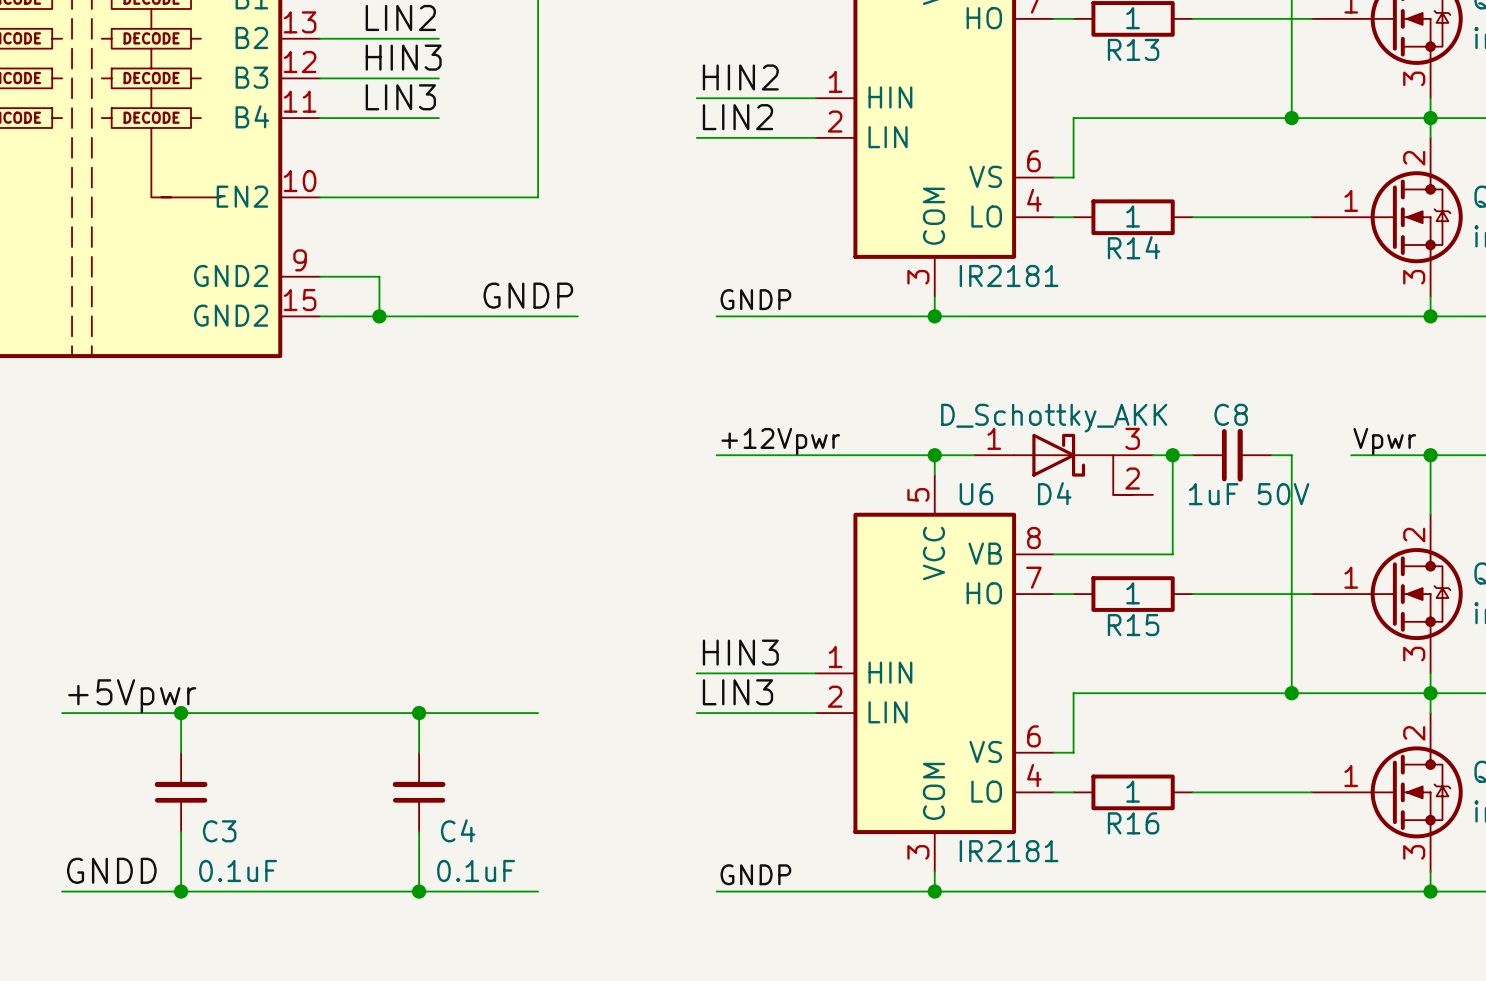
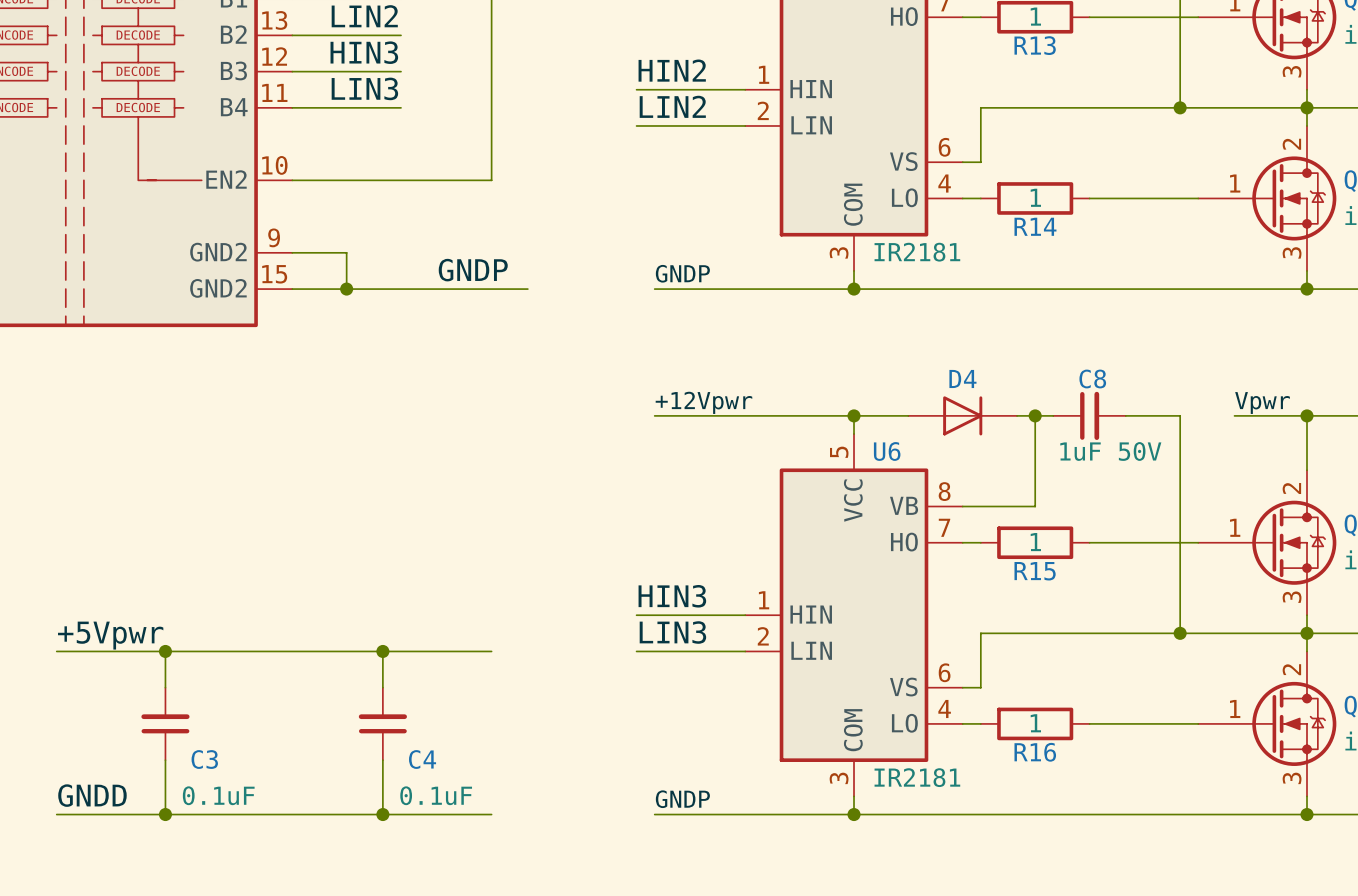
D4 value: D_Schottky_AKK (1054, 418) -> none
D4 symbol: [974, 433, 1153, 495] -> [908, 396, 1018, 436]
wire: (1172, 455) (1172, 554) (1133, 554) -> (1035, 415) (1035, 506)
junction position: (1172, 455) -> (1035, 415)
C8 position: (1232, 455) -> (1089, 415)
D4 name position: D4 (1054, 493) -> D4 (962, 378)

